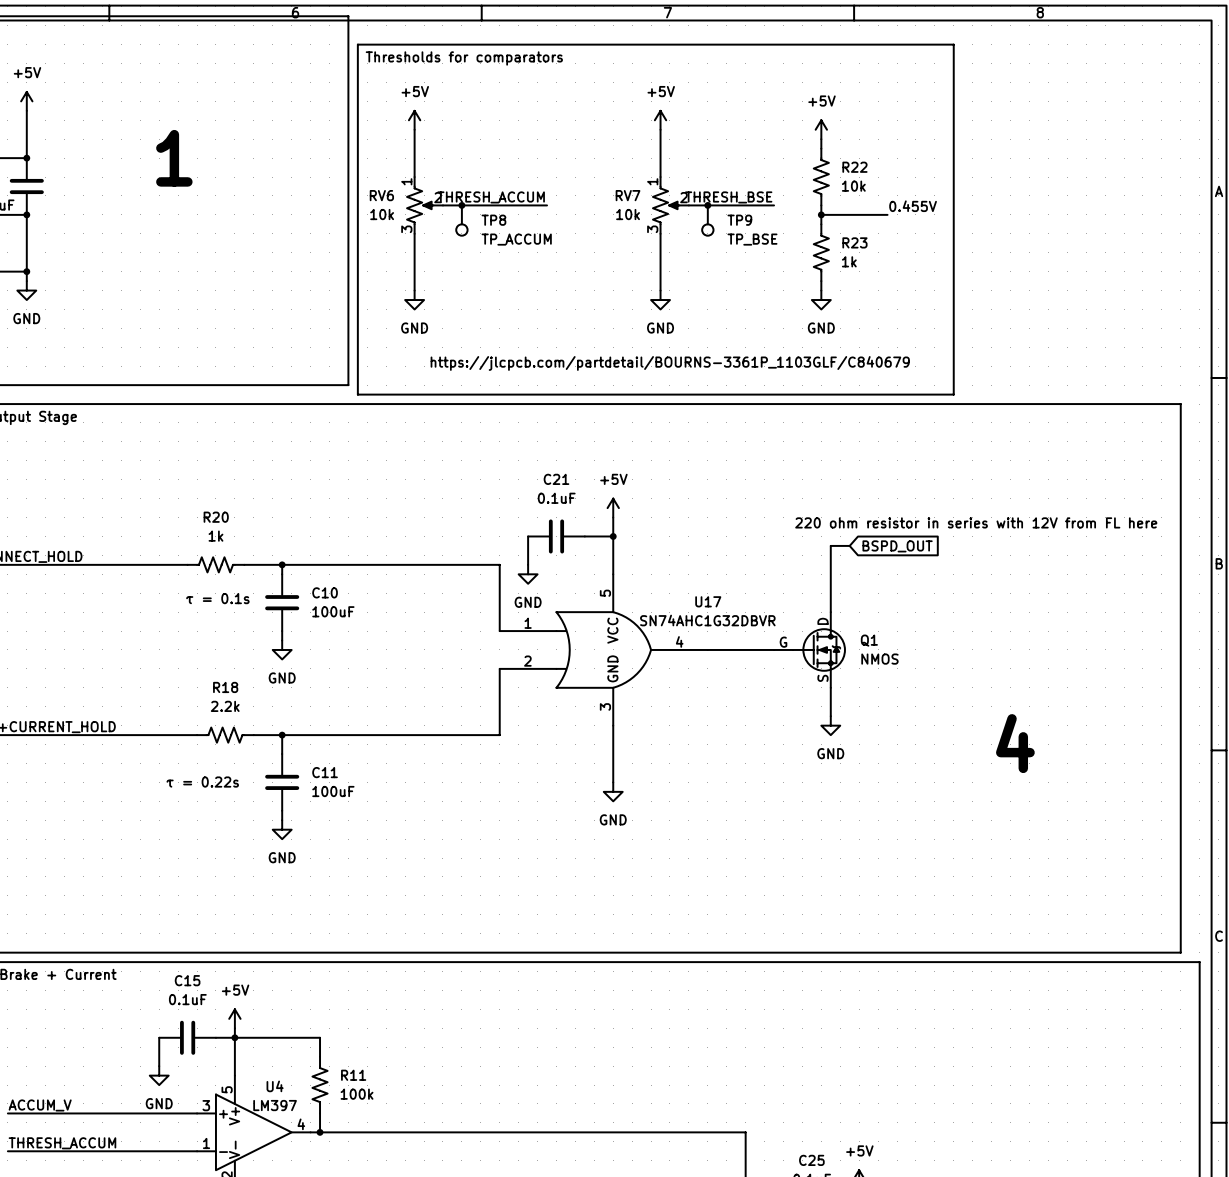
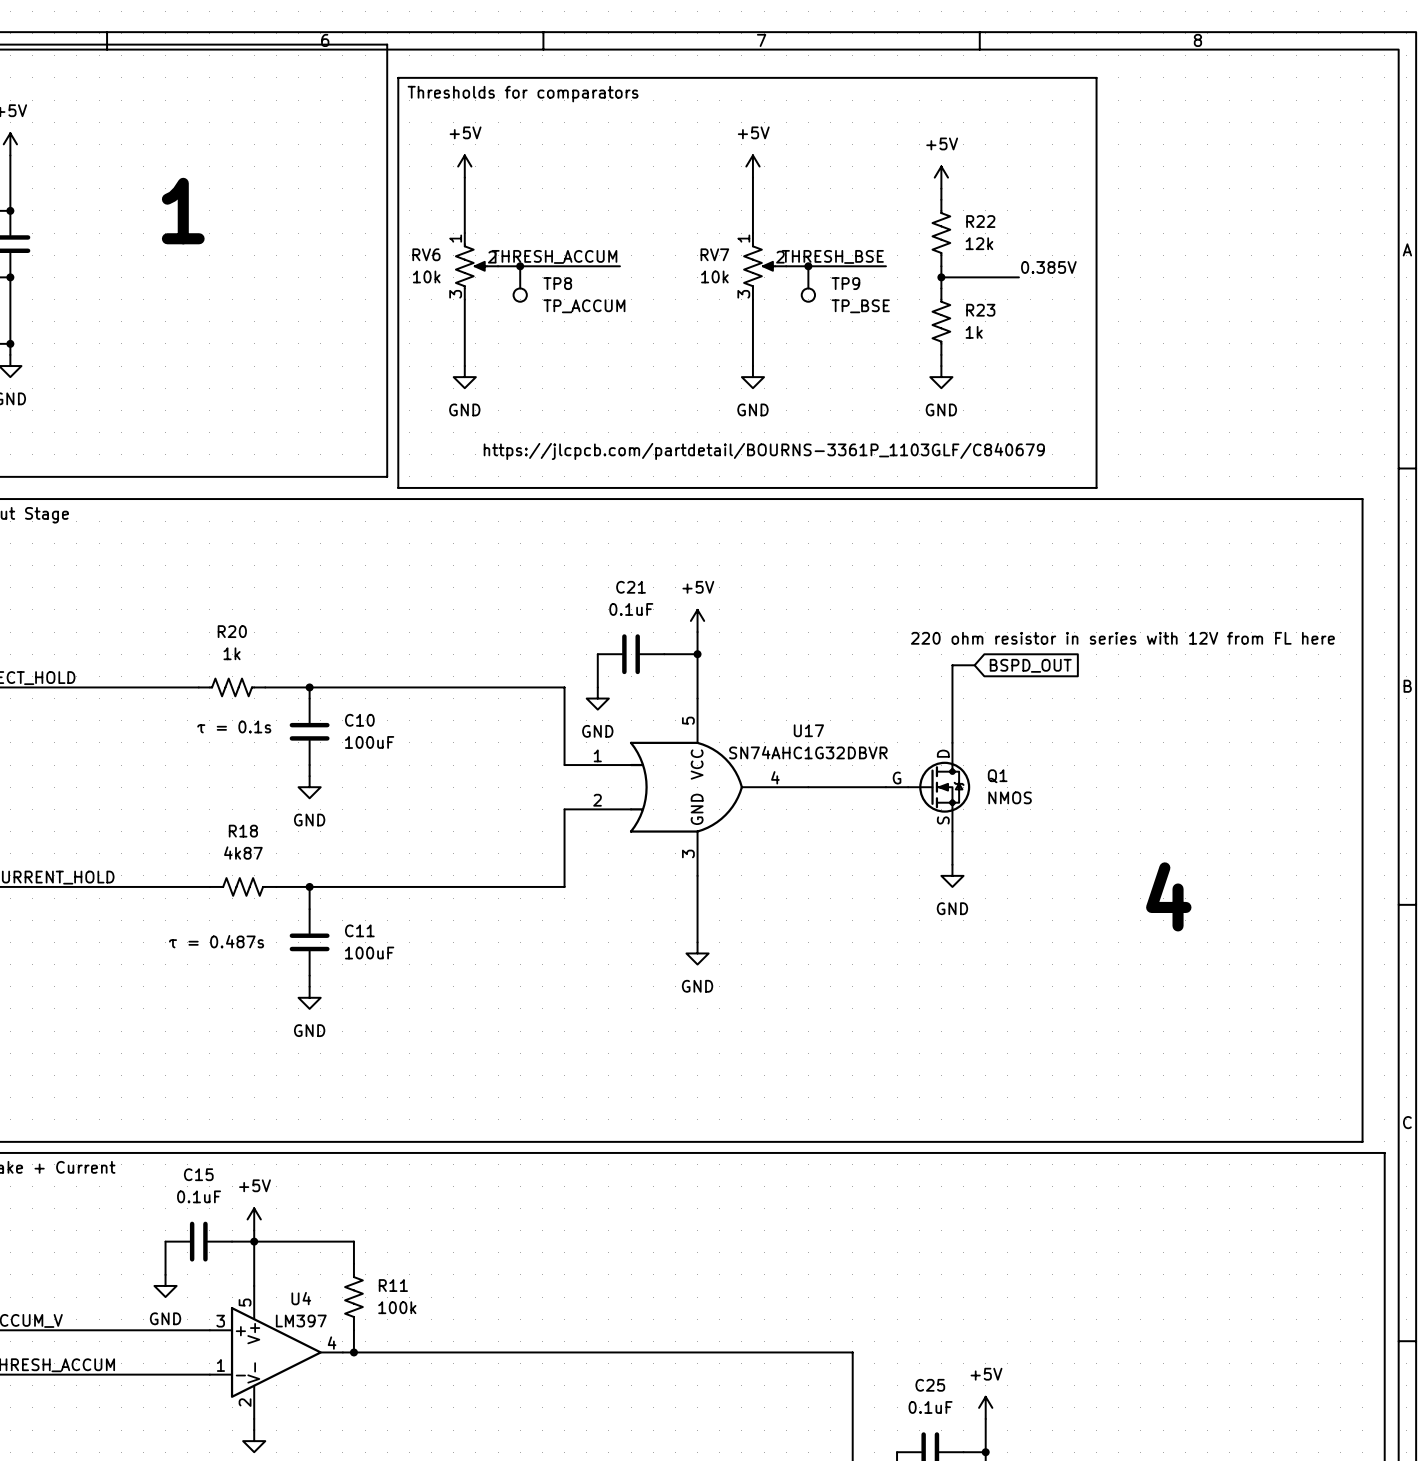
R22 value: 10k (853, 186) -> 12k (979, 243)
label: 0.455V (913, 206) -> 0.385V (1048, 267)
R18 value: 2.2k (225, 706) -> 4k87 (243, 853)
text: τ = 0.22s (202, 782) -> τ = 0.487s (216, 941)

